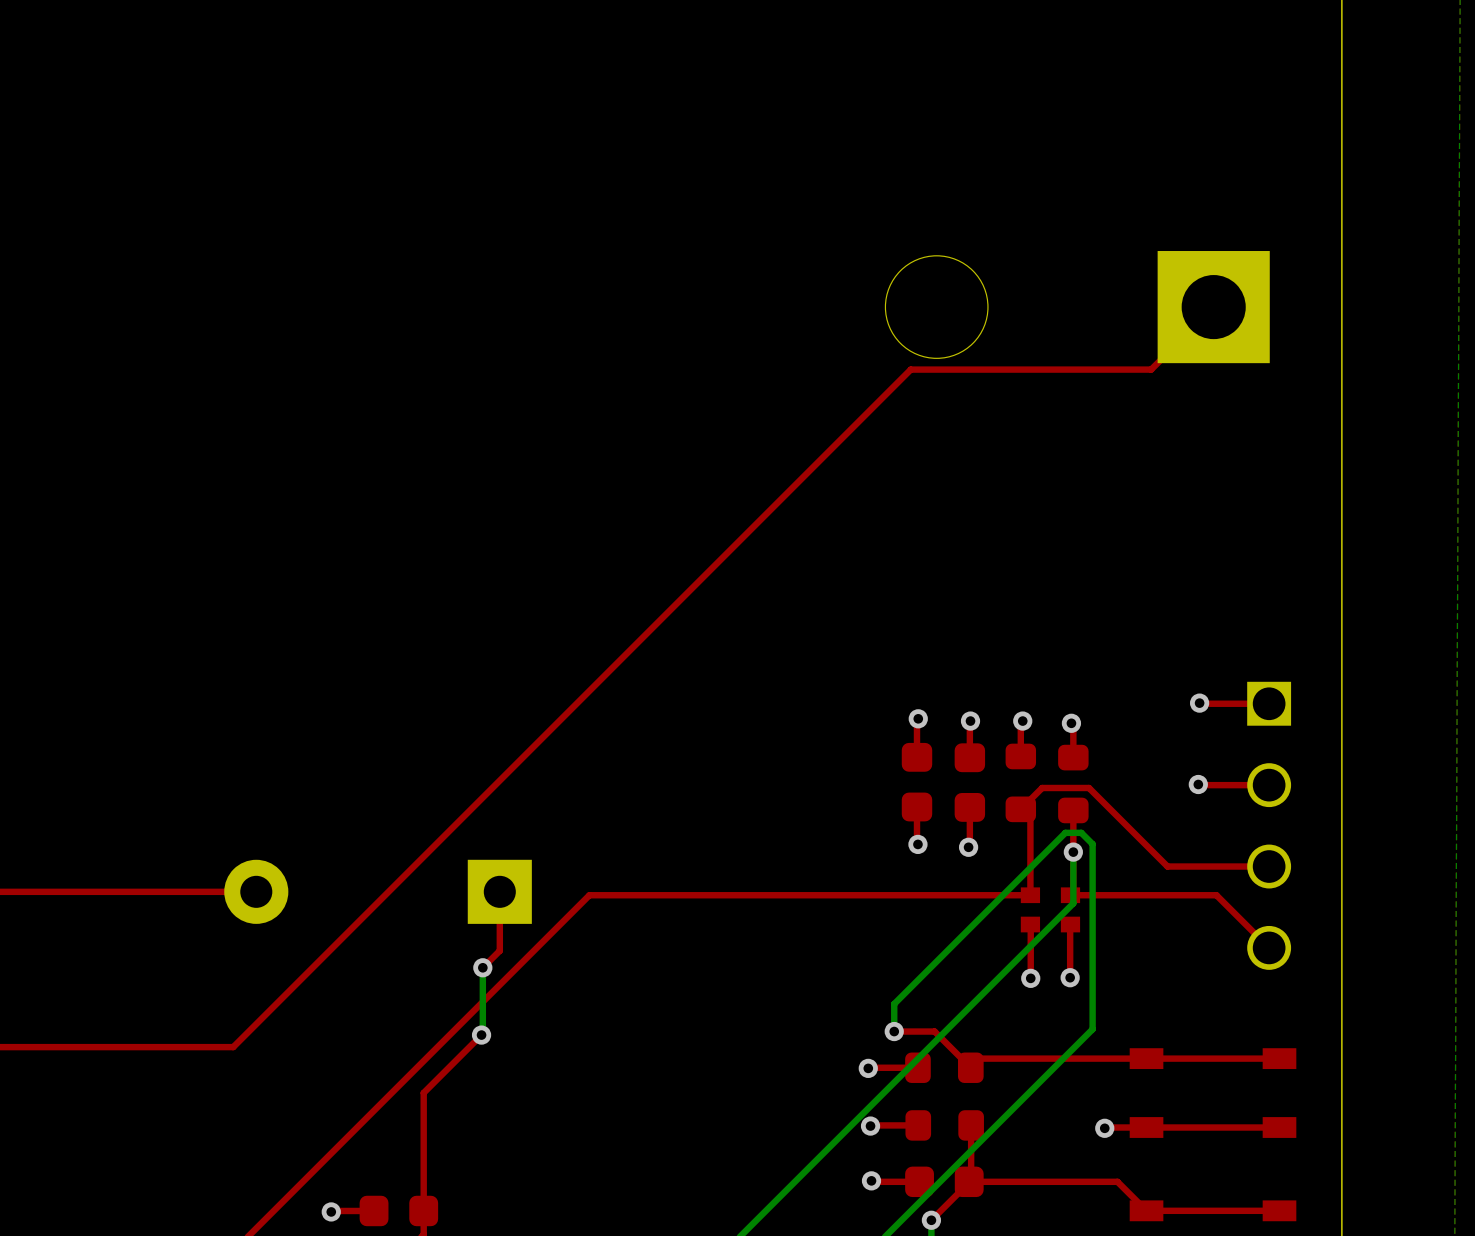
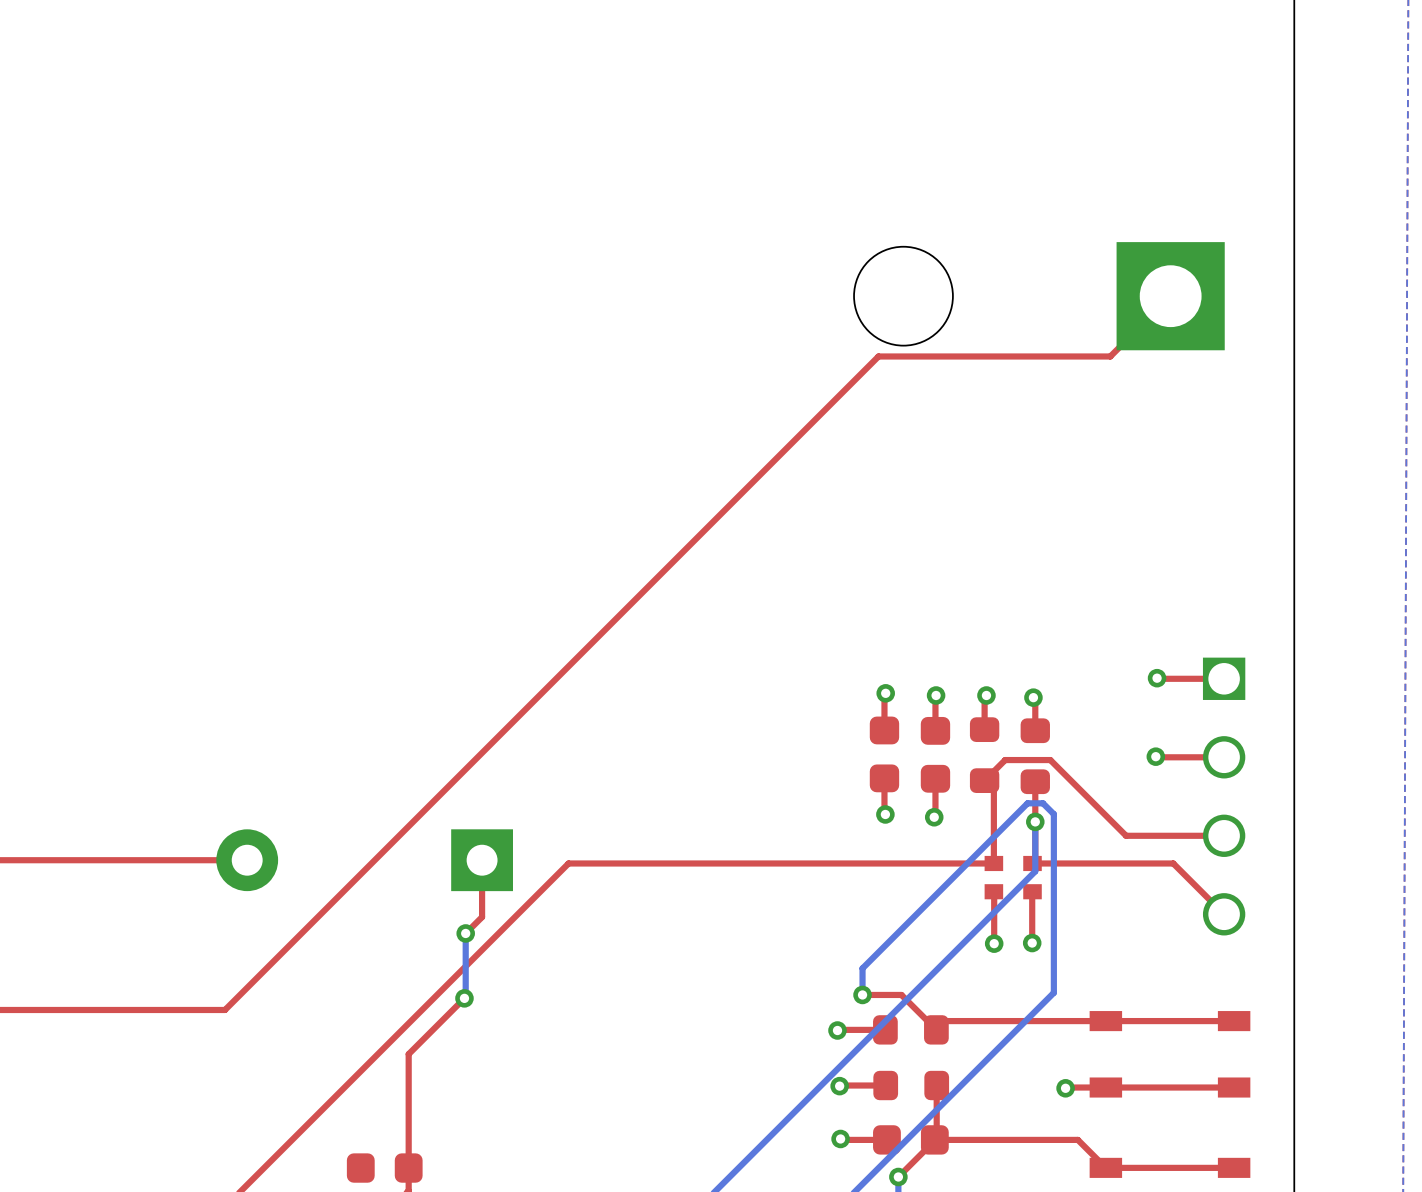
top track: (374, 1210) (331, 1211) -> none
via: (331, 1211) -> none

